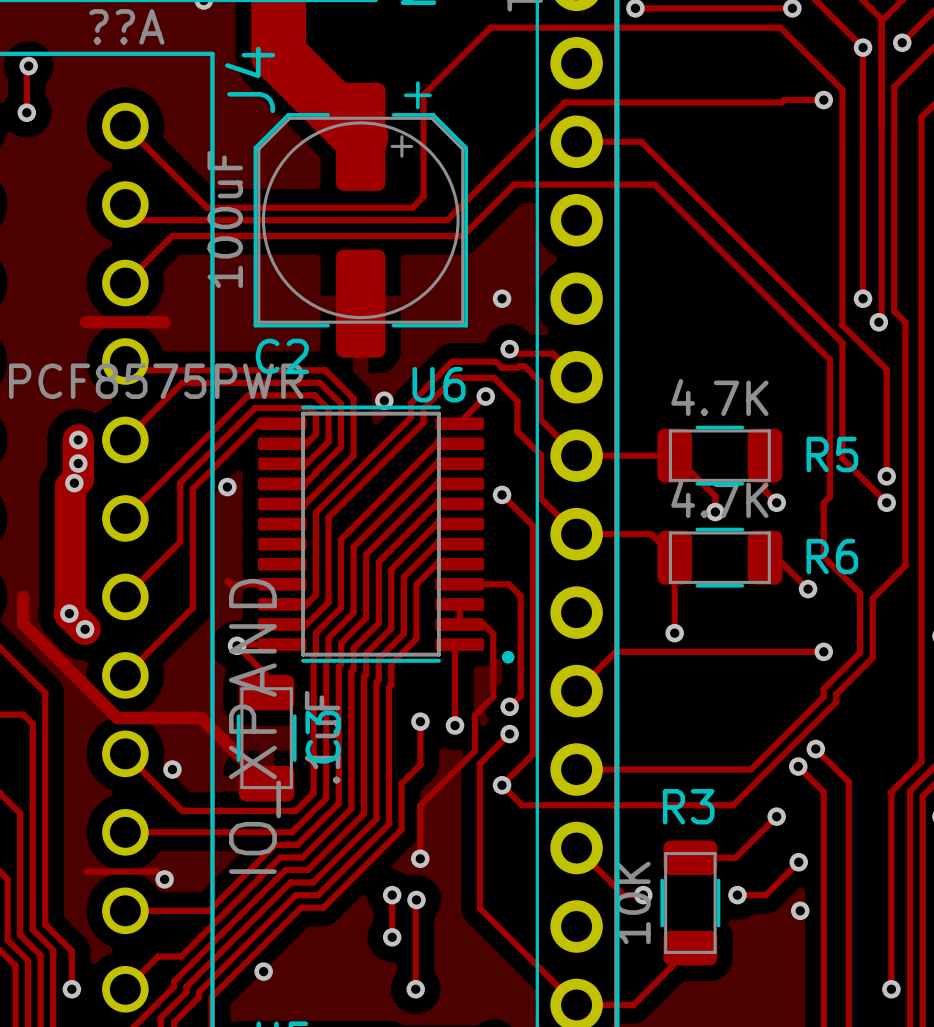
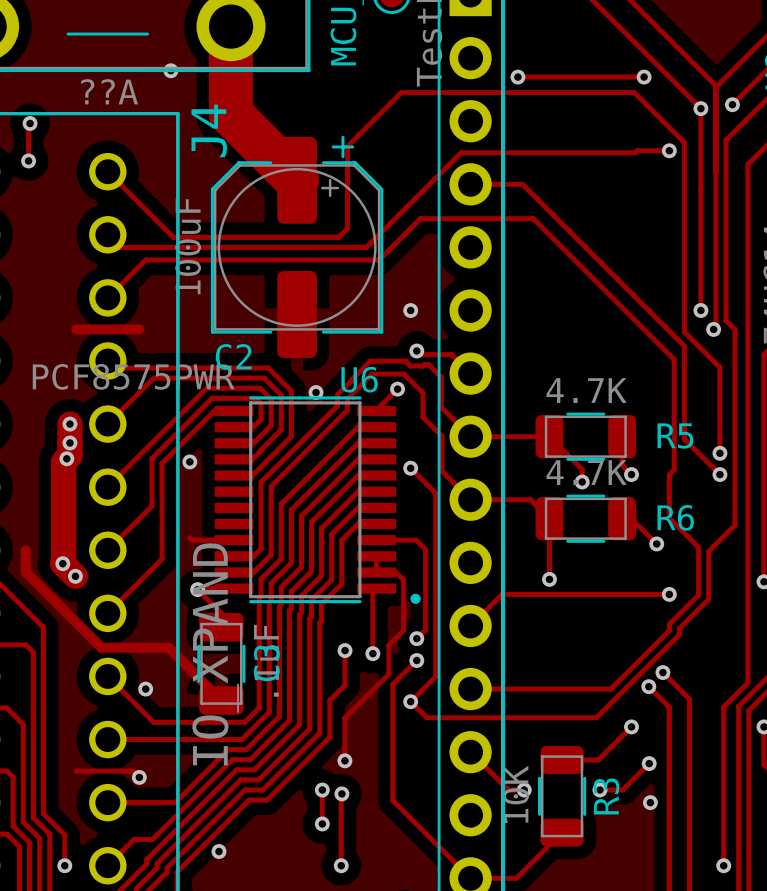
R3 name rotation: 0° (688, 806) -> 90° counterclockwise (606, 796)
R3 name position: R3 (688, 806) -> R3 (606, 796)

